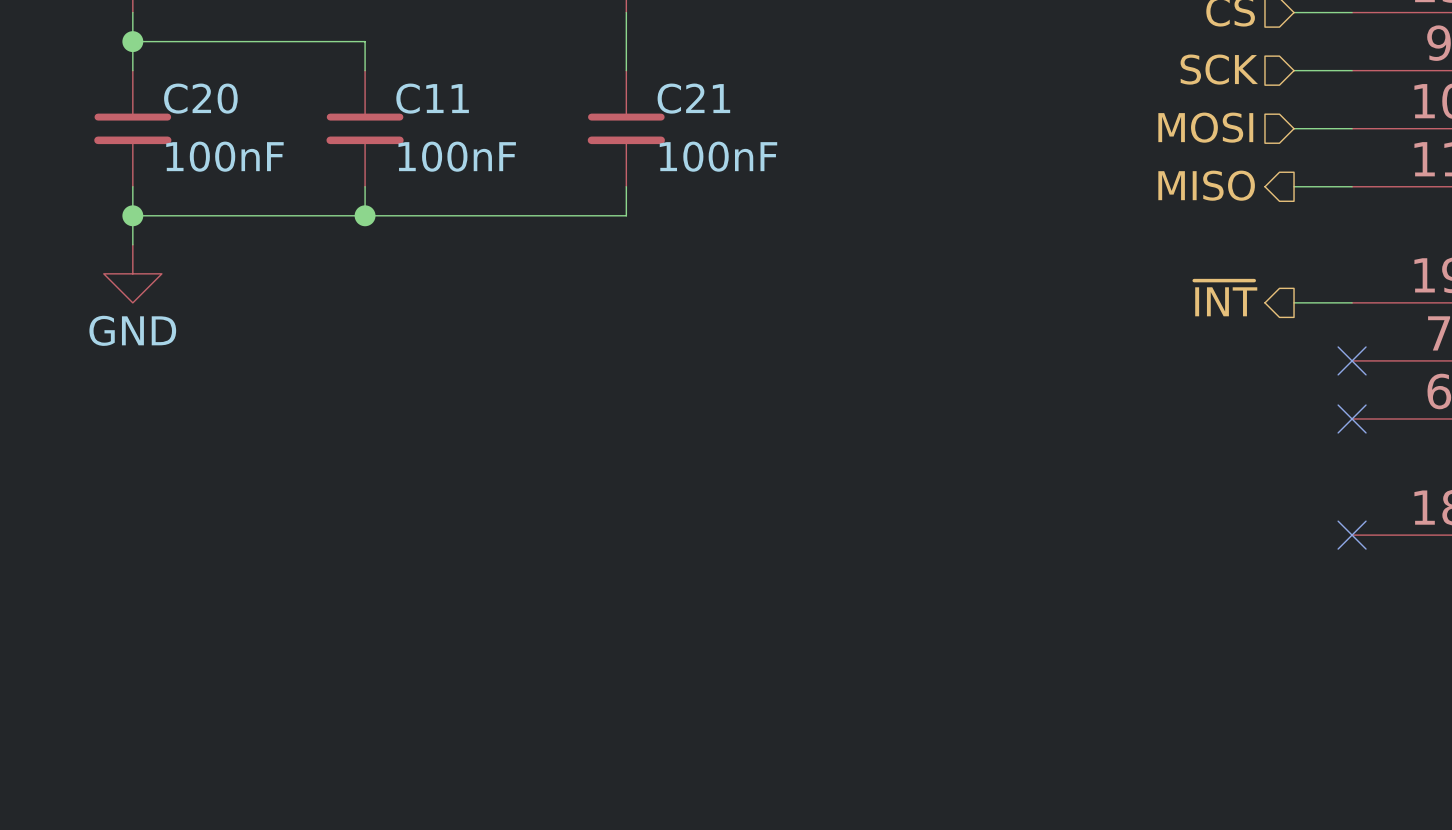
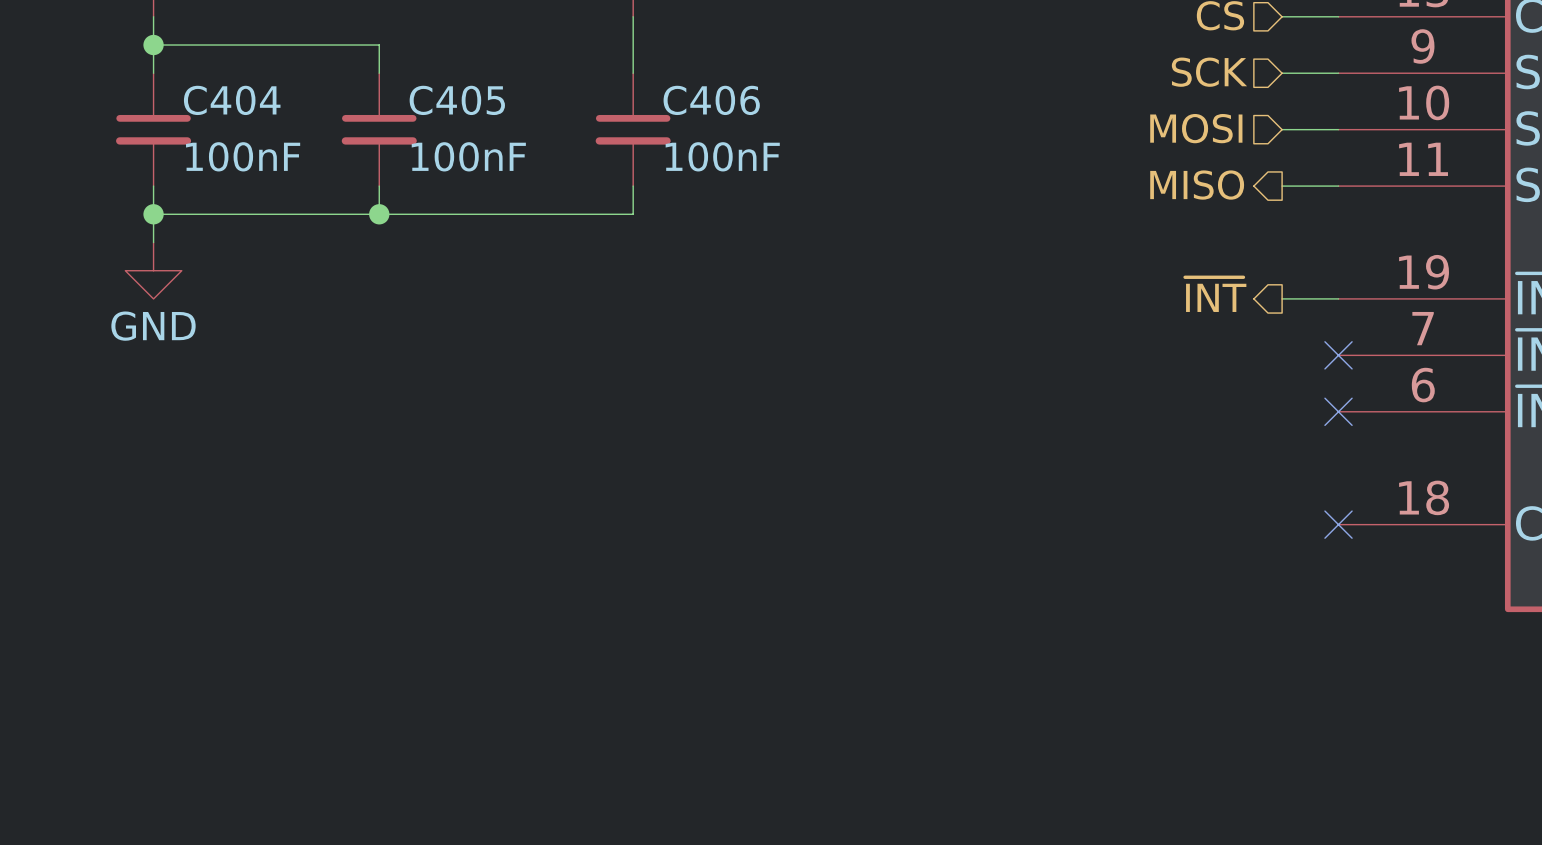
C20 name: C20 (200, 98) -> C404 (232, 100)
C11 name: C11 (432, 98) -> C405 (457, 100)
C21 name: C21 (693, 98) -> C406 (711, 100)

